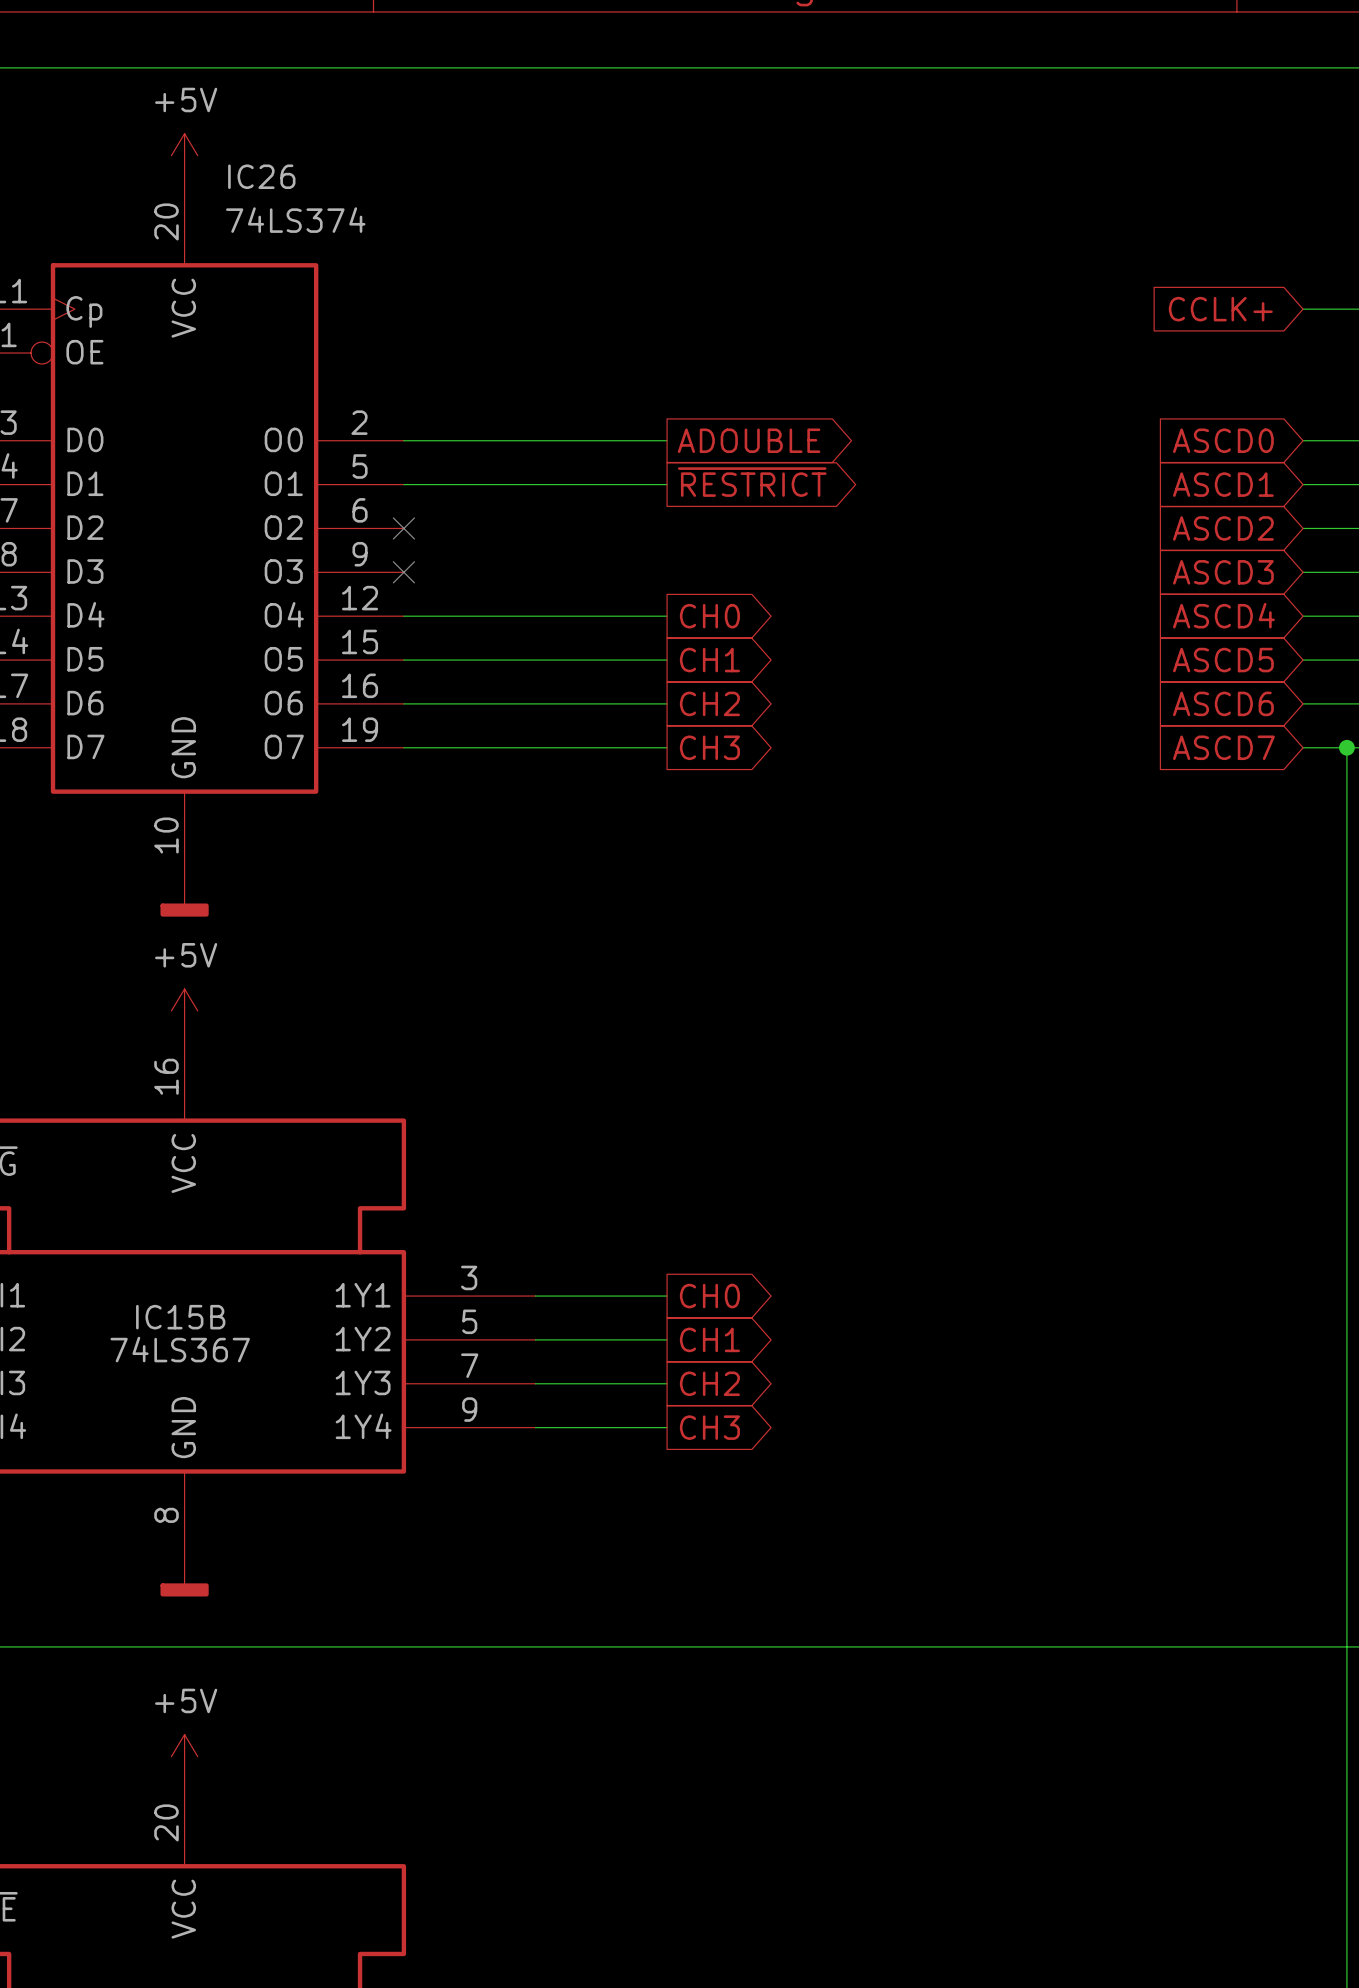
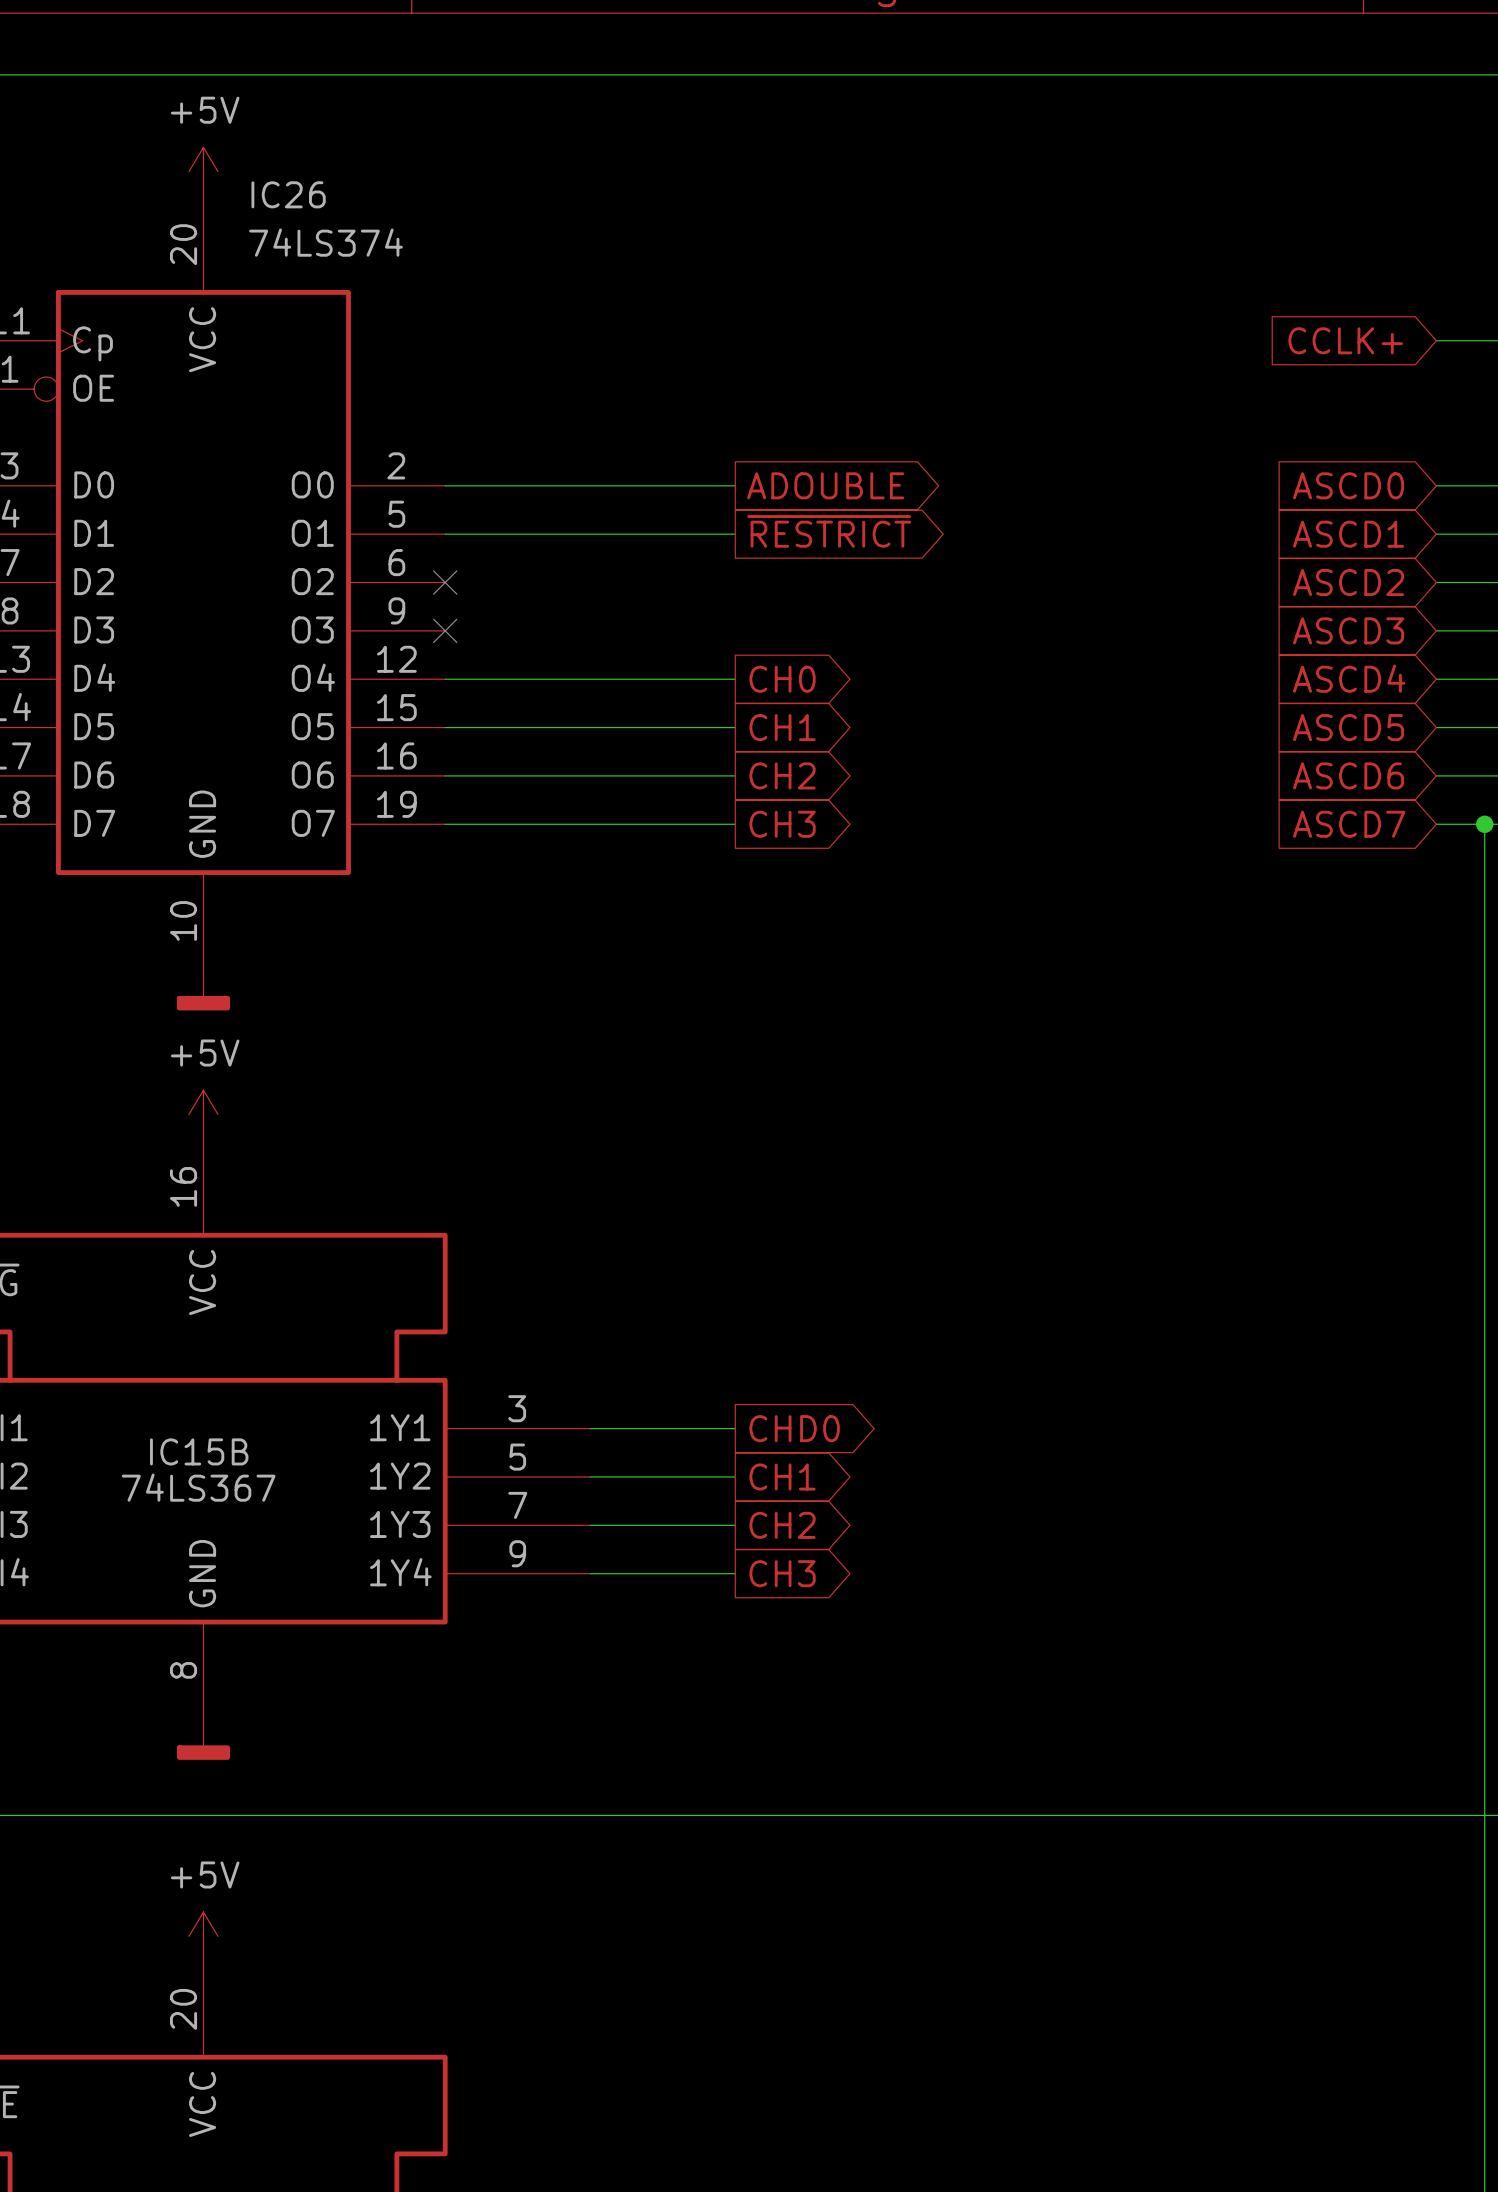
global label: CH0 (709, 1296) -> CHD0 (794, 1428)

